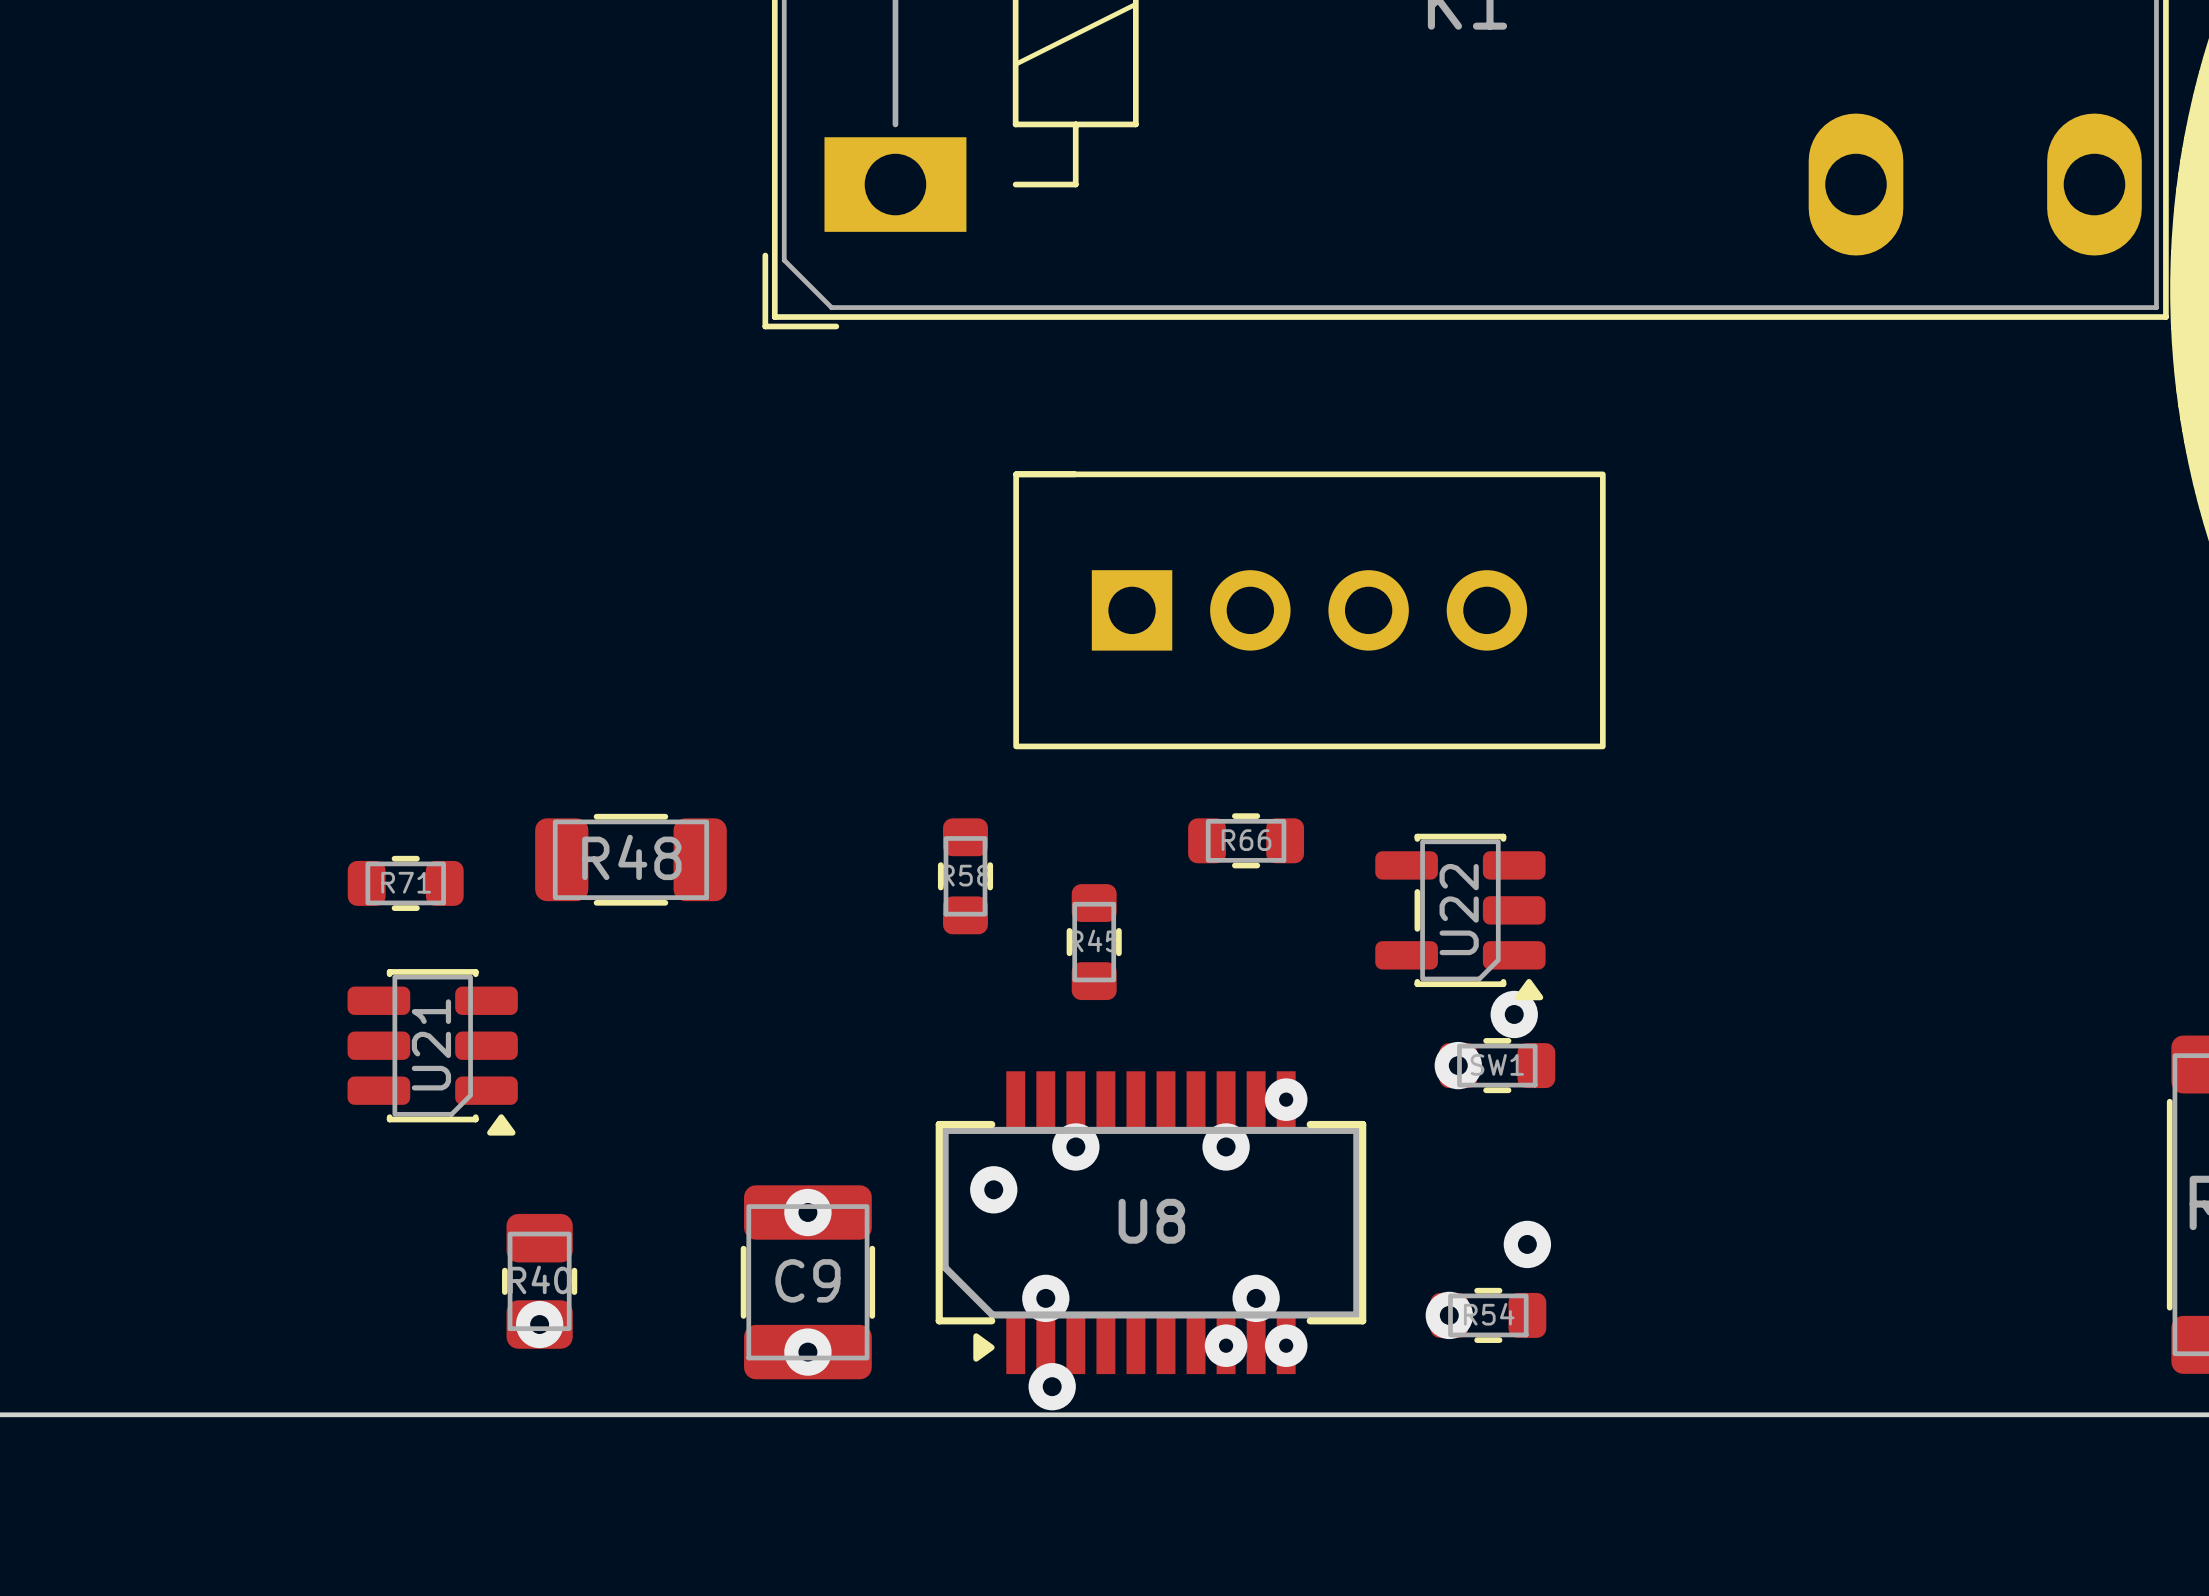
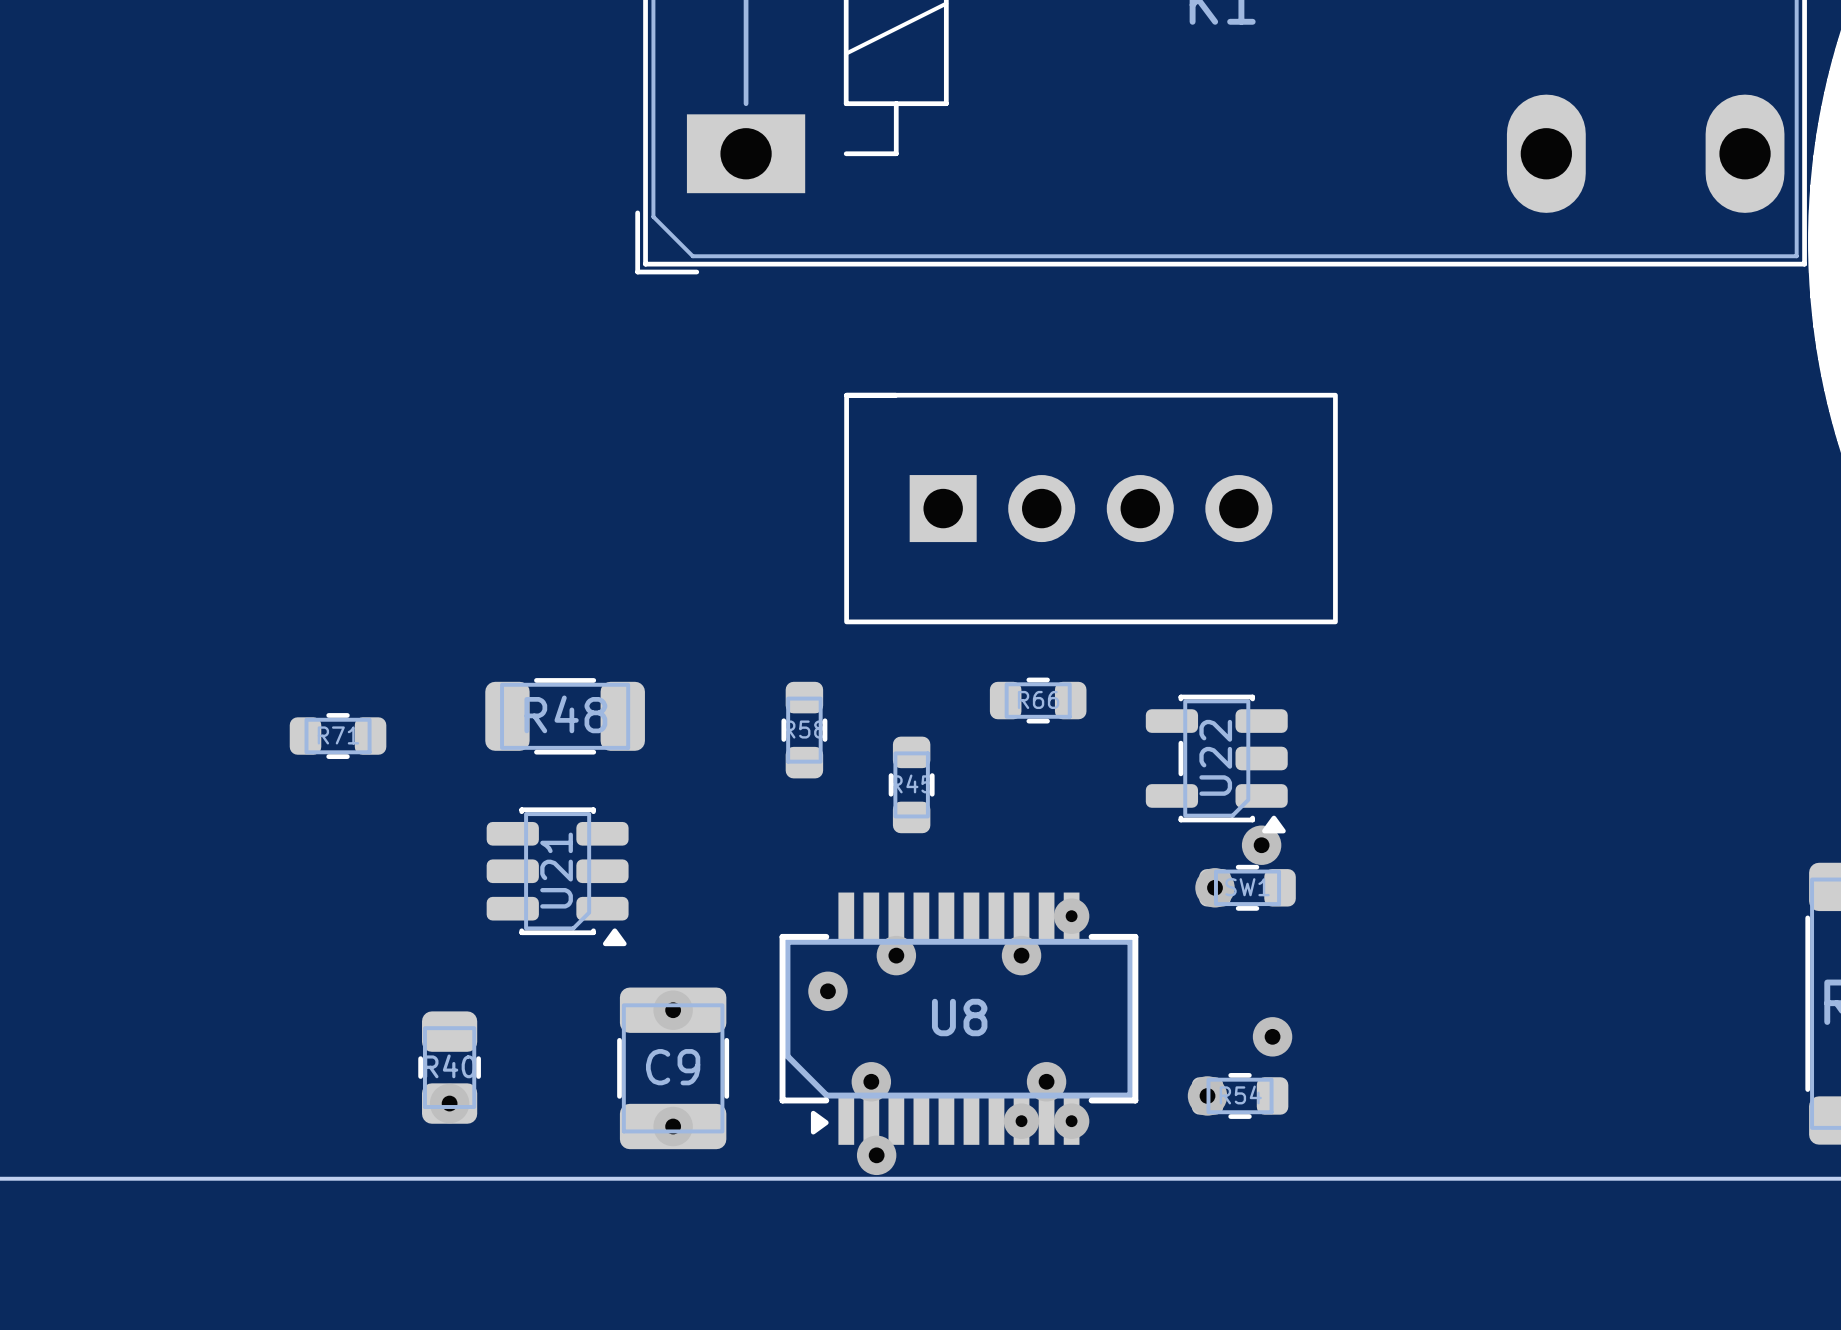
R48 position: (630, 859) -> (565, 716)
U21 position: (432, 1052) -> (557, 876)

